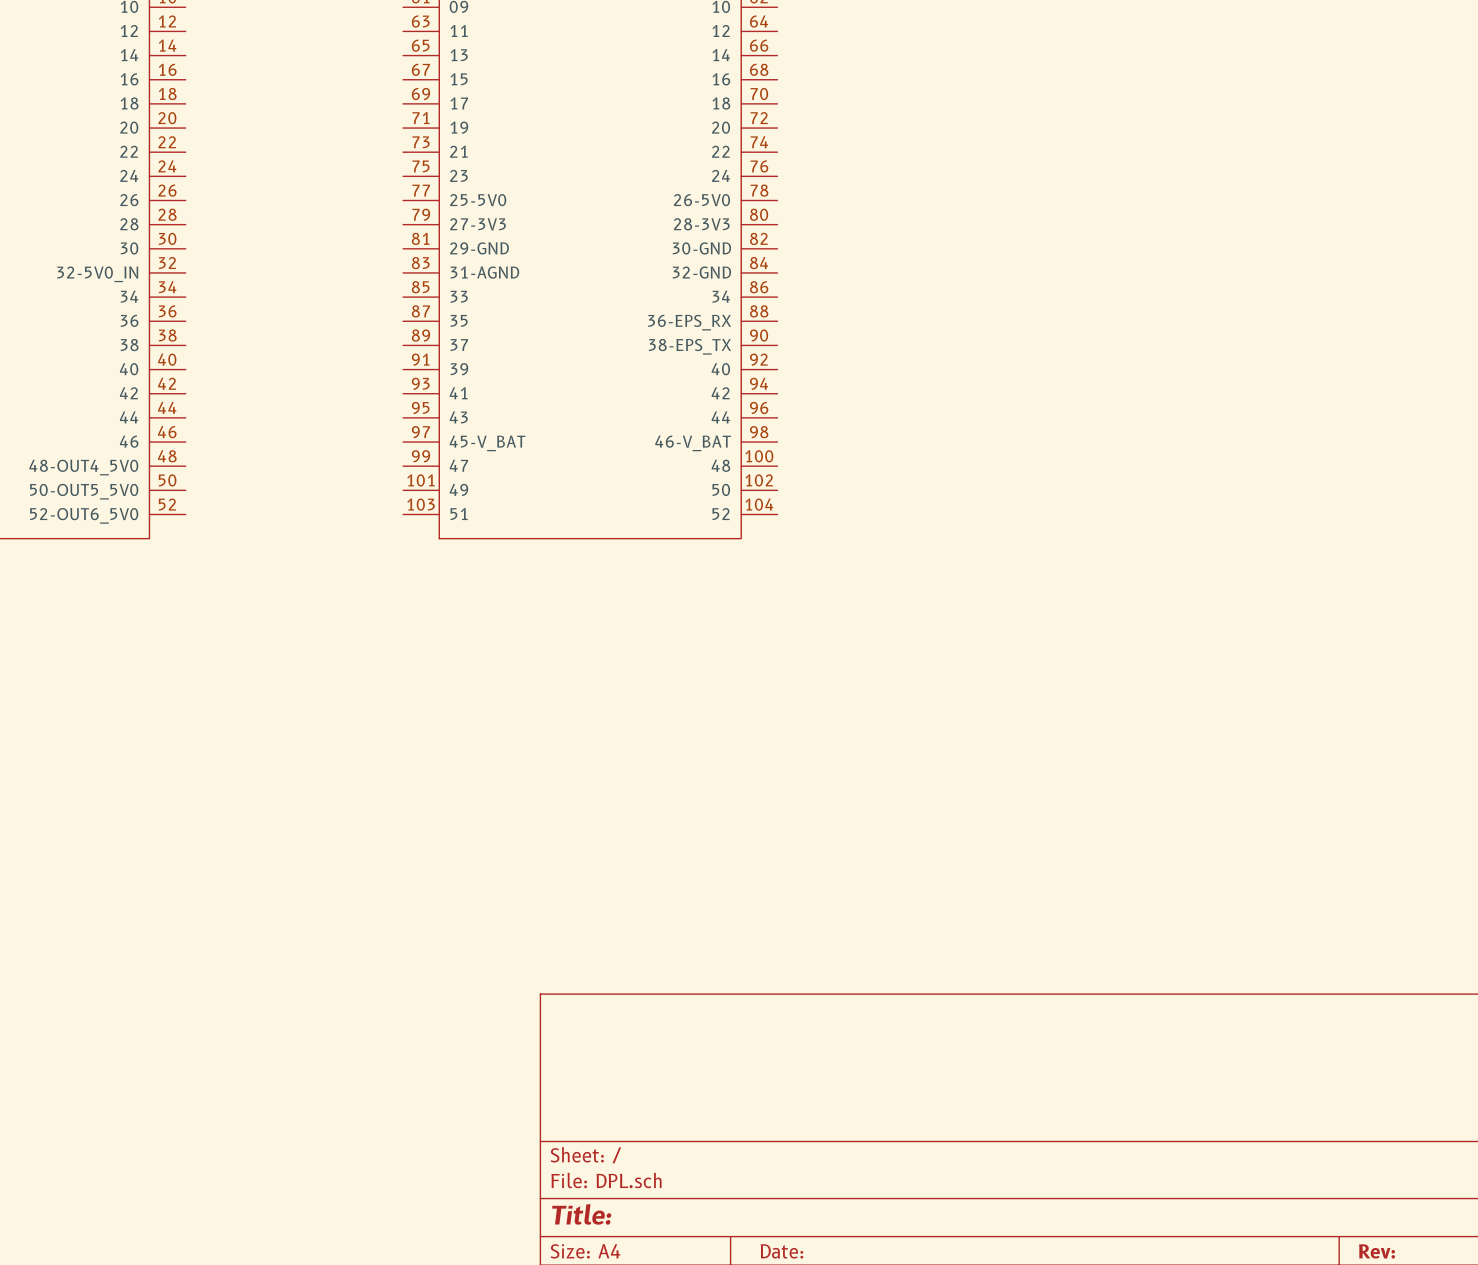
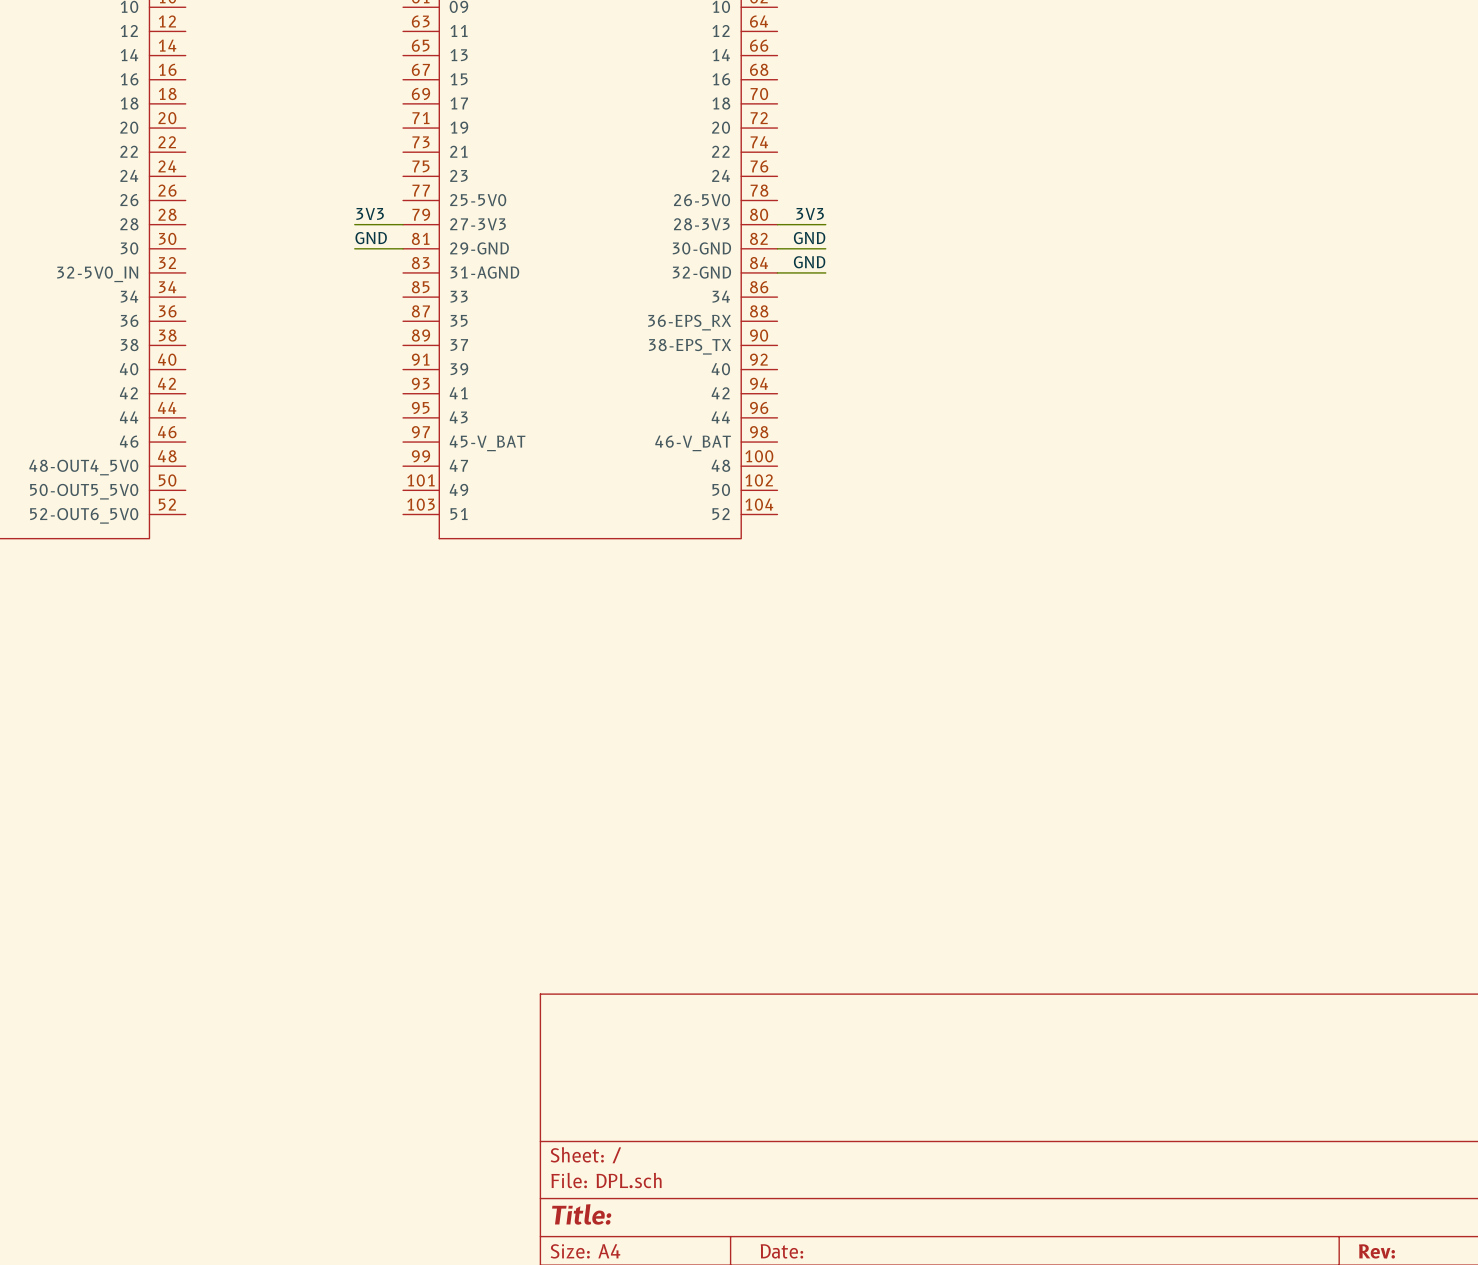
label: none -> 3V3 (370, 213)
label: none -> 3V3 (810, 213)
wire: none -> (354, 224) (403, 224)
wire: none -> (777, 224) (825, 224)
label: none -> GND (371, 238)
label: none -> GND (809, 238)
wire: none -> (354, 248) (403, 248)
wire: none -> (777, 248) (825, 248)
label: none -> GND (809, 262)
wire: none -> (777, 272) (825, 272)

